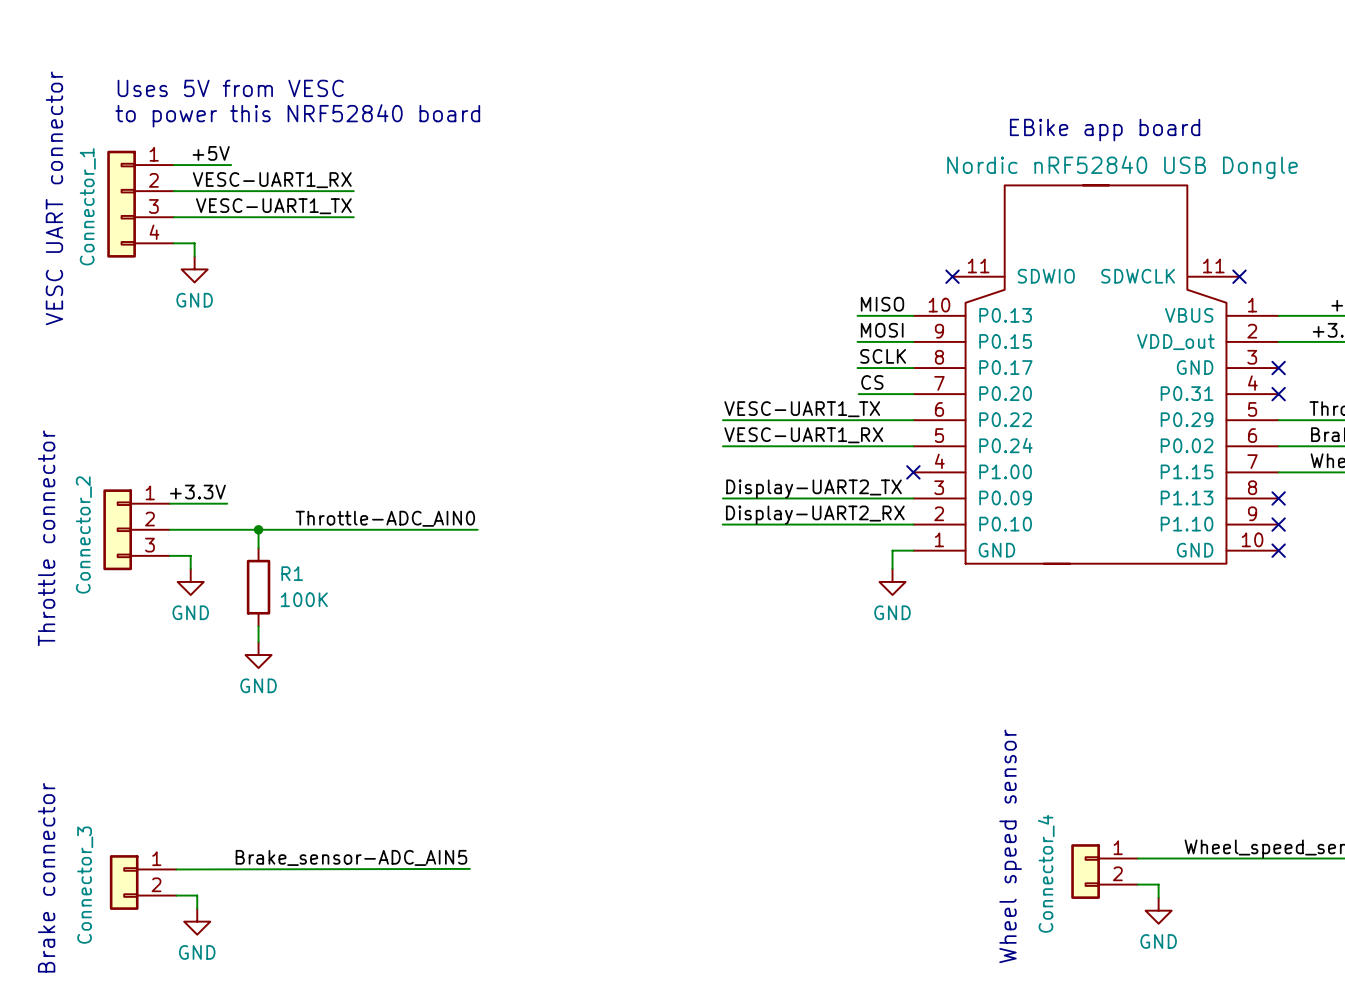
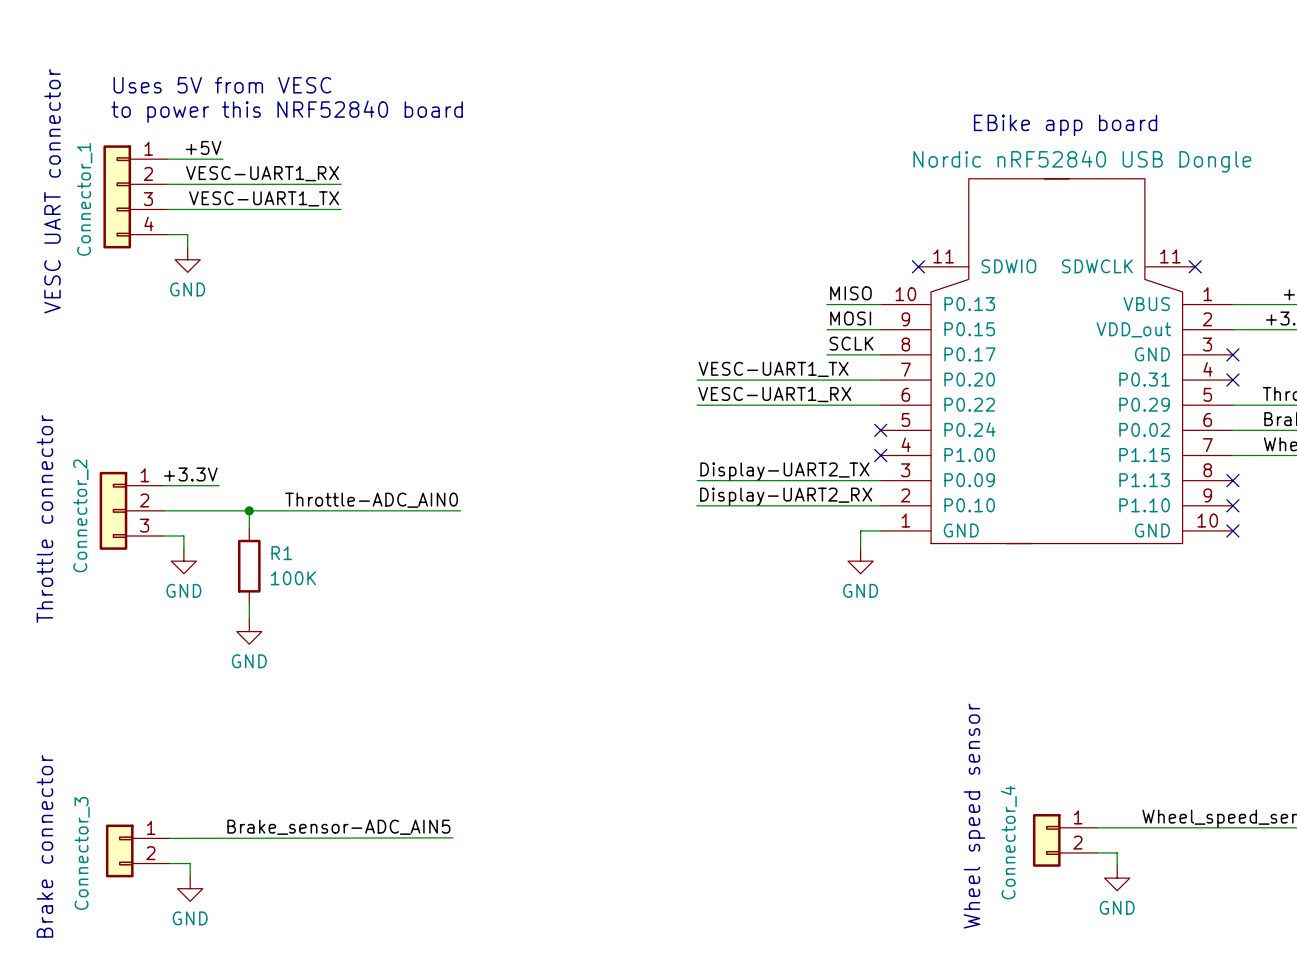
label: CS (872, 382) -> none
label: none -> VESC-UART1_TX (773, 369)
wire: none -> (697, 380) (827, 380)
label: VESC-UART1_TX (802, 409) -> VESC-UART1_RX (774, 394)
label: VESC-UART1_RX (803, 435) -> none
wire: (722, 446) (913, 446) -> none
no-connect mark: none -> (880, 430)

